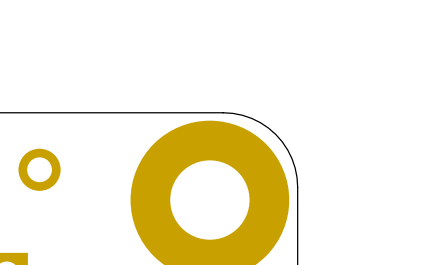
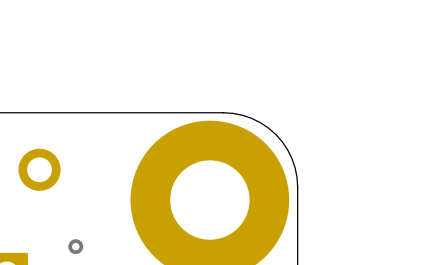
via: none -> (75, 246)

